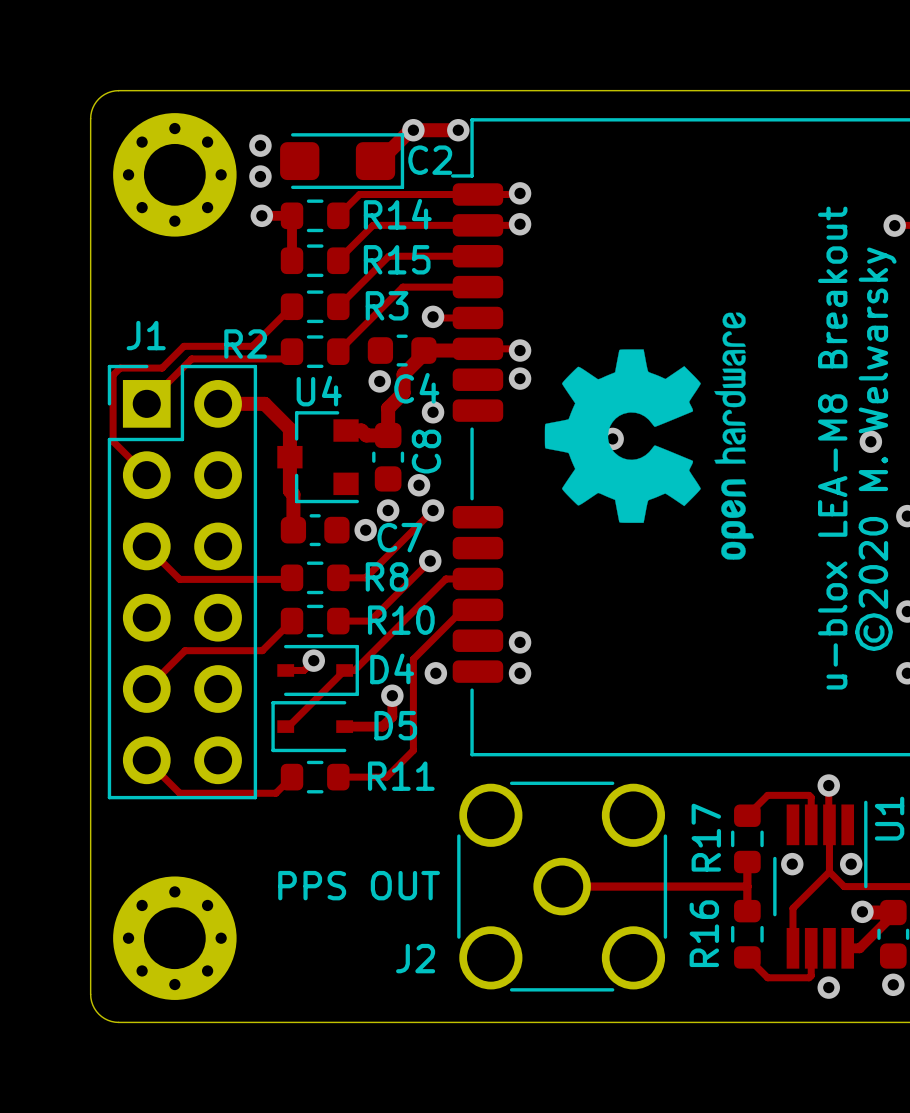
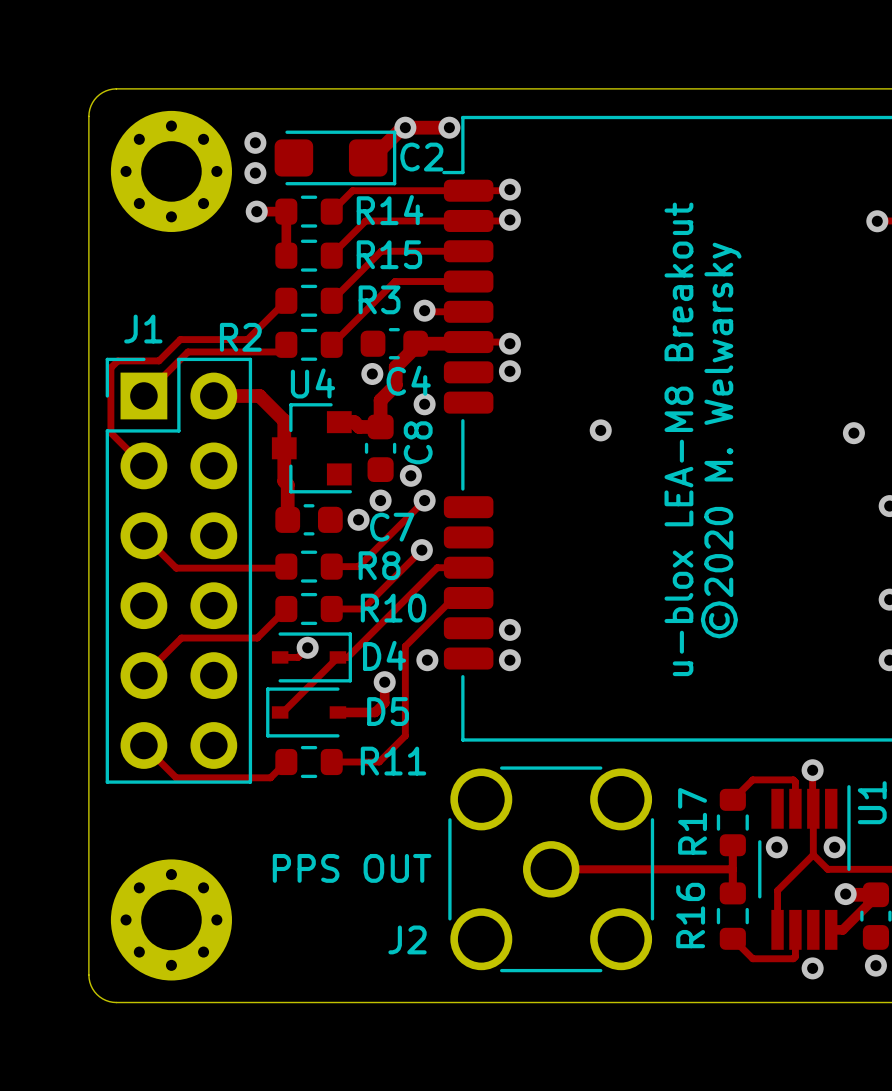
drawing: [544, 312, 754, 560] -> none
text position: u-blox LEA-M8 Breakout (832, 448) -> u-blox LEA-M8 Breakout (678, 439)
text position: ©2020 M. Welwarsky (875, 449) -> ©2020 M. Welwarsky (721, 440)

